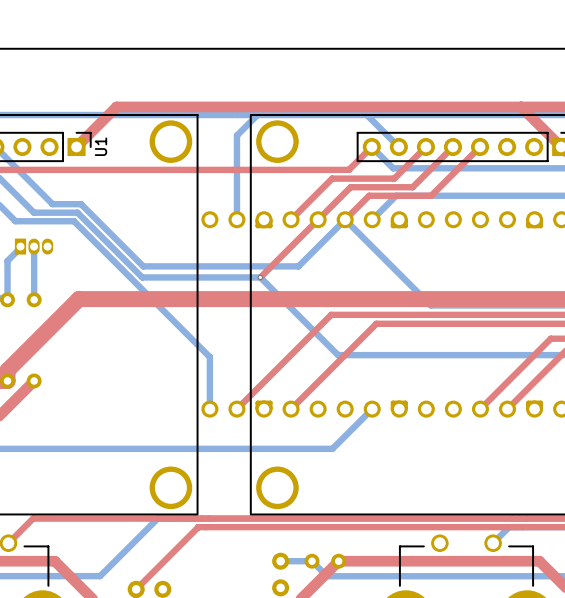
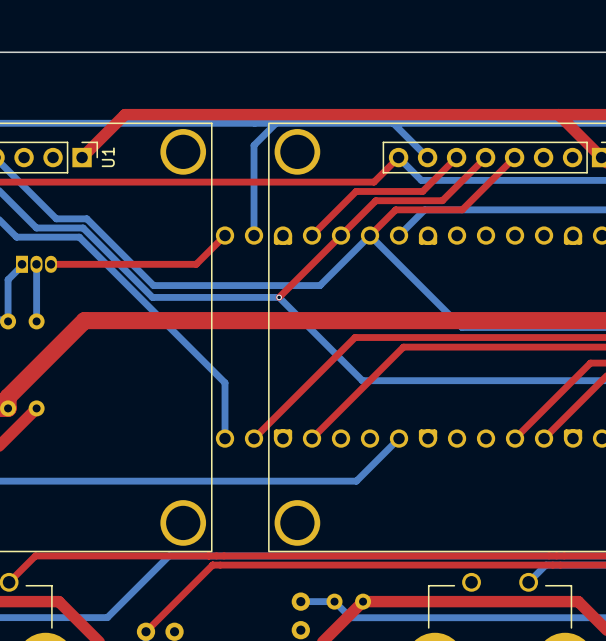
top track: none -> (225, 235) (196, 264) (51, 264)

